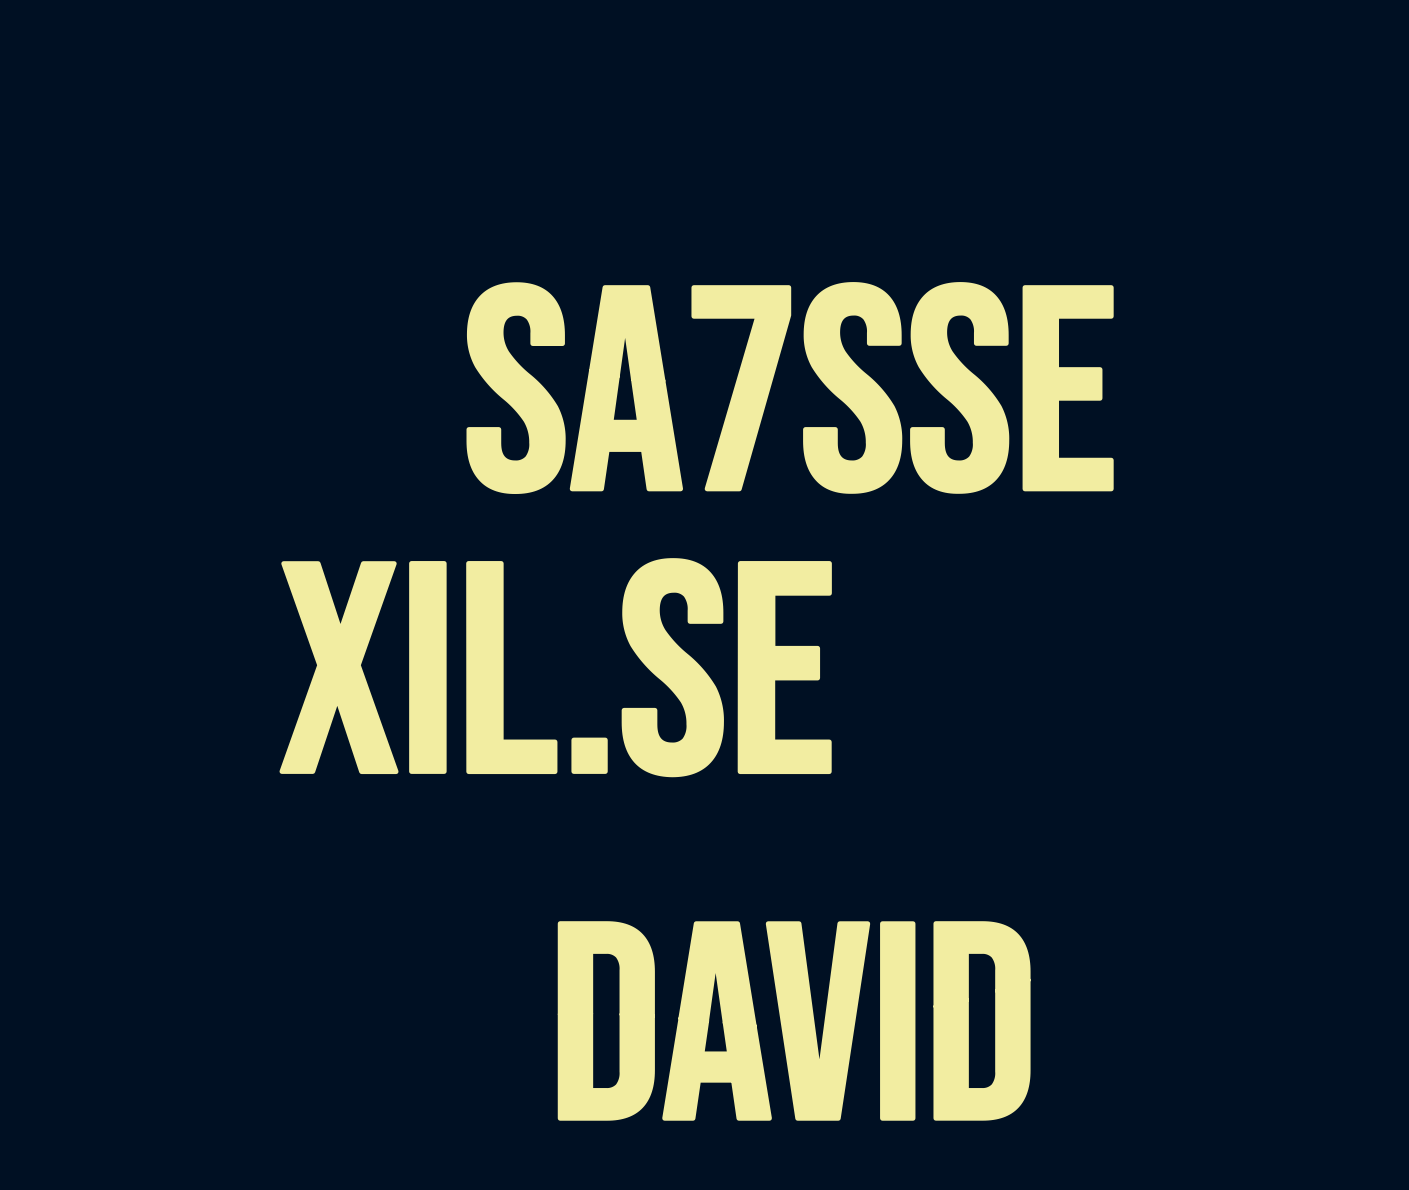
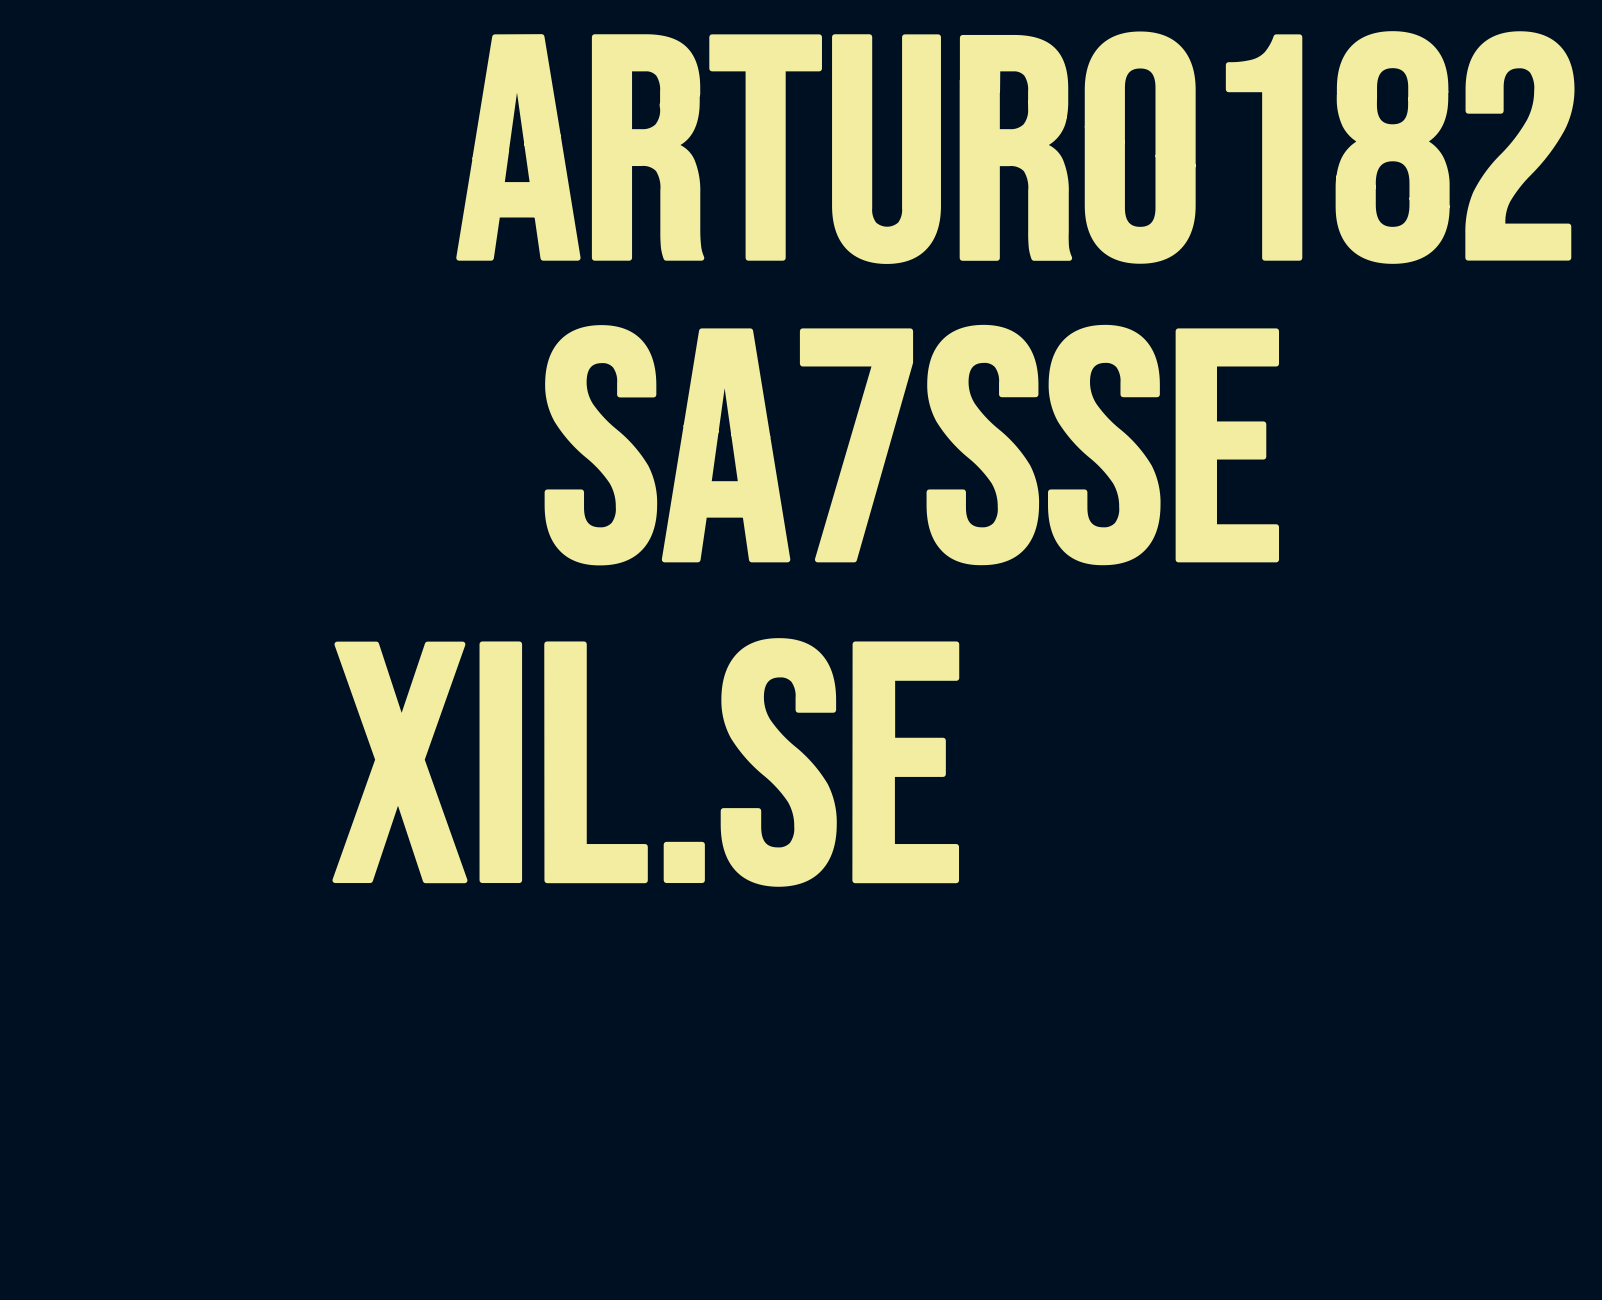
drawing: none -> [456, 31, 1196, 264]
drawing: none -> [1335, 31, 1575, 264]
drawing: none -> [1225, 34, 1303, 261]
drawing: [557, 921, 1031, 1121] -> none

